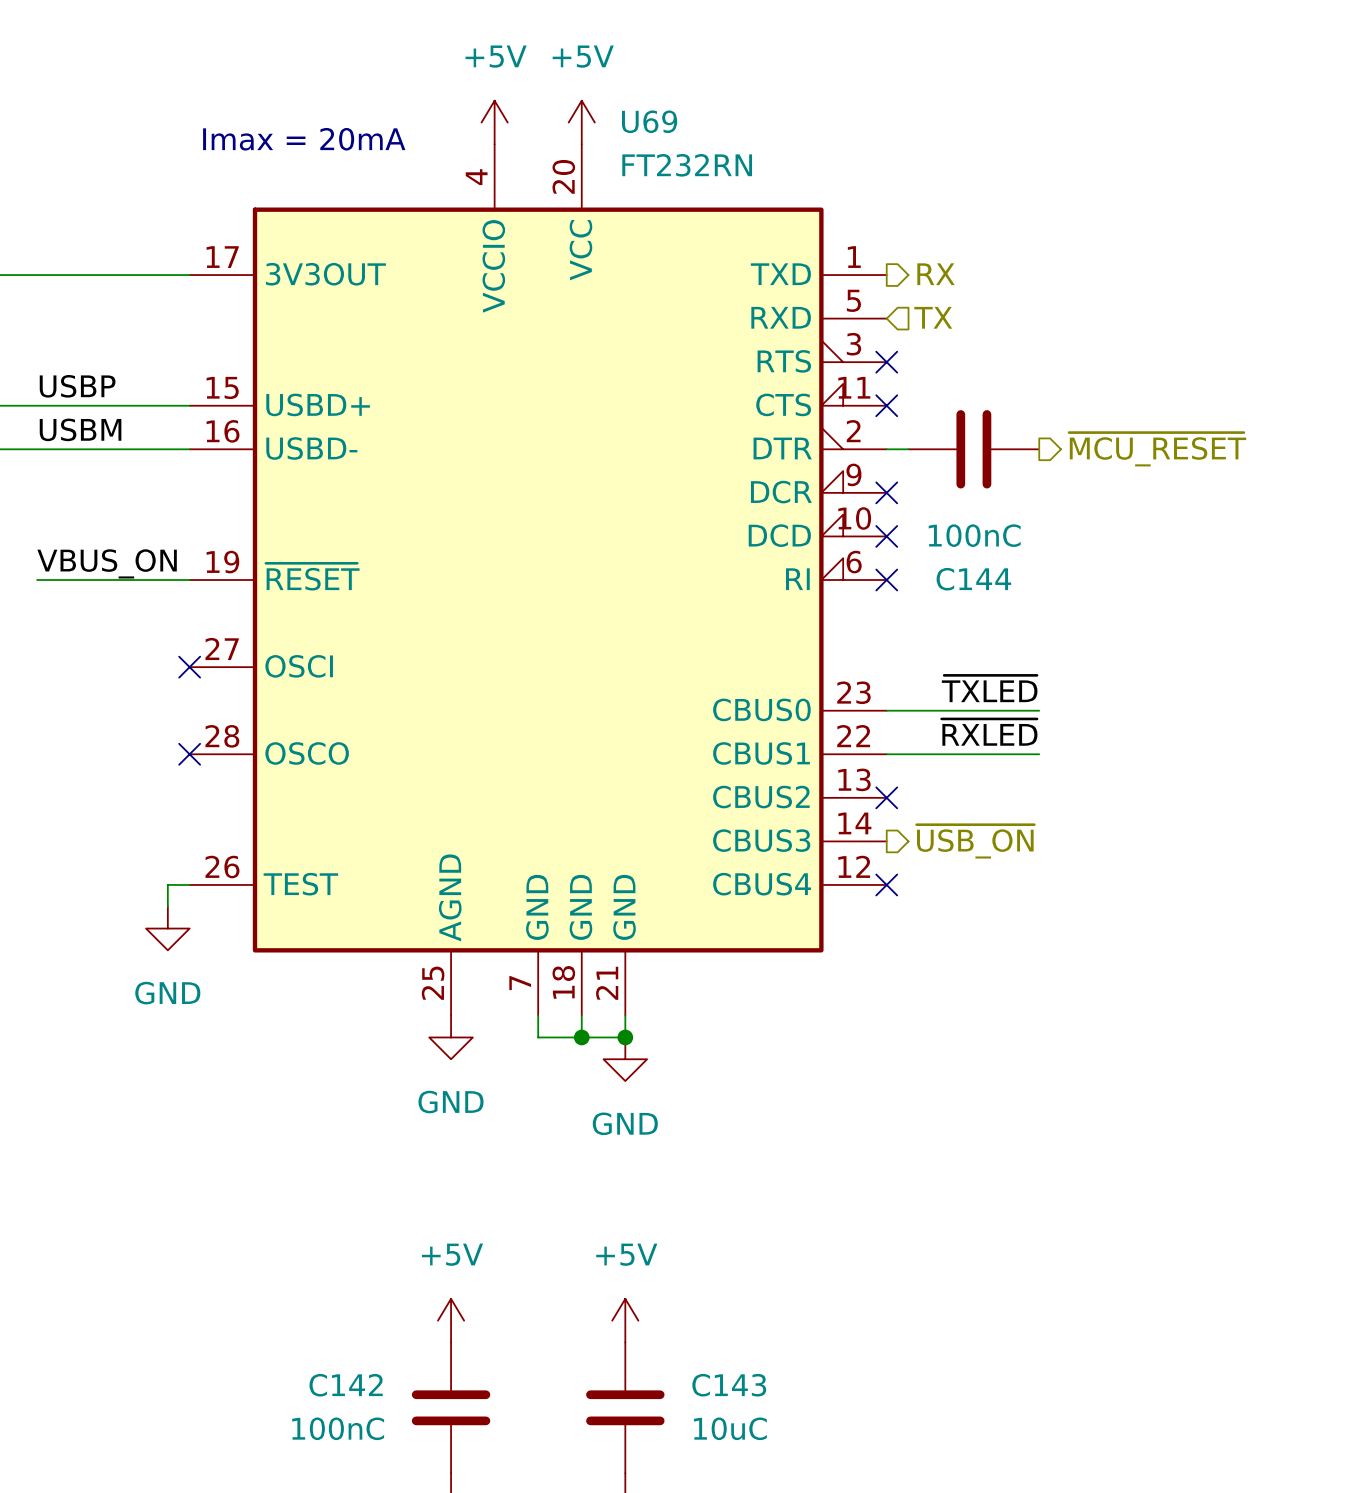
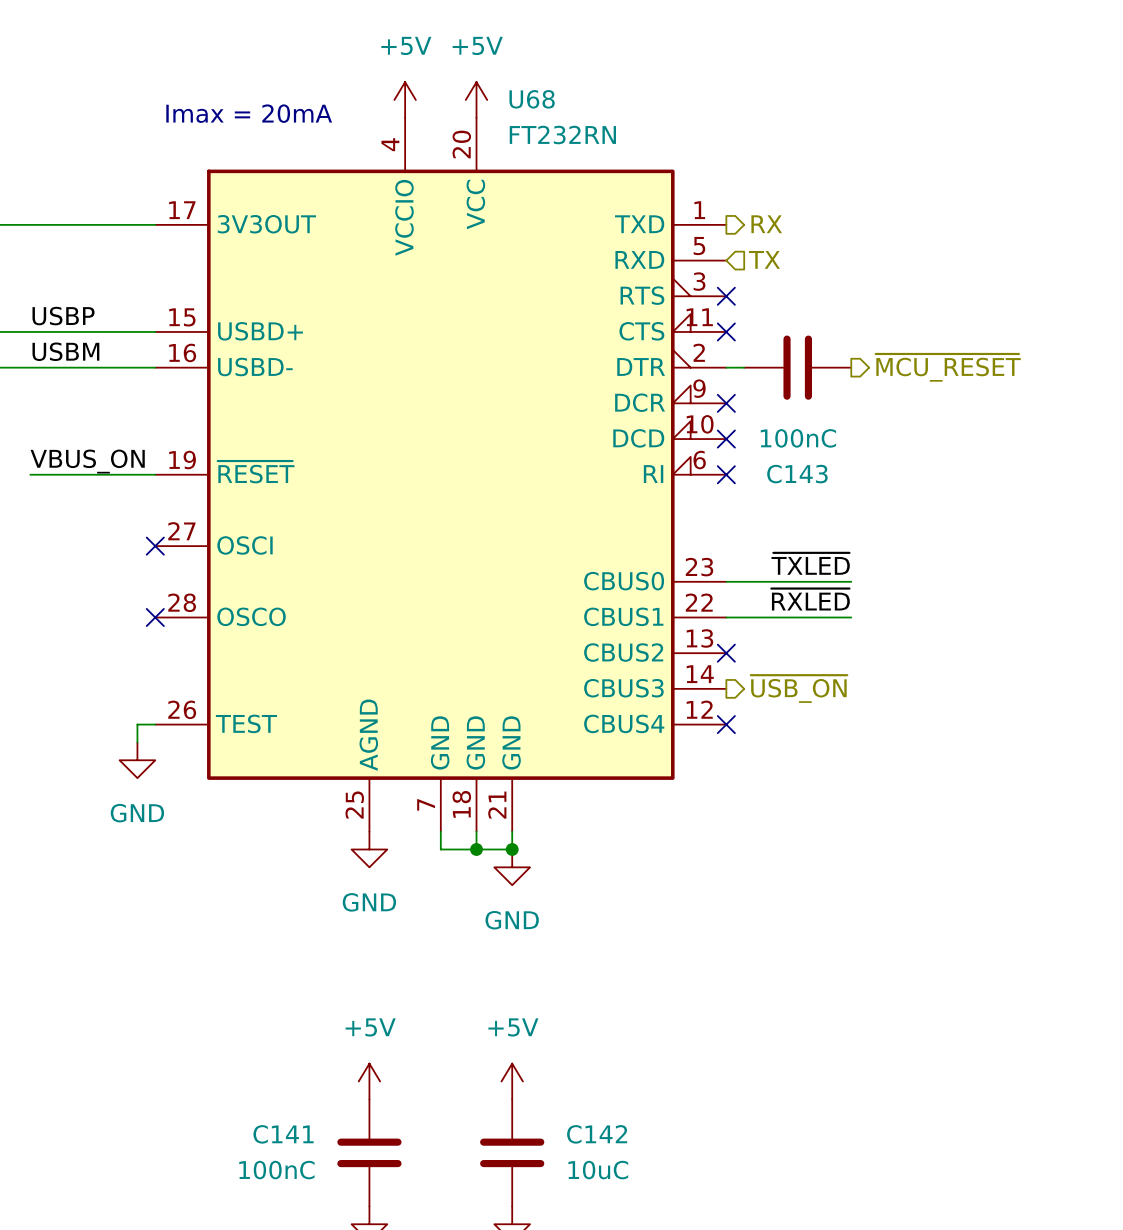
U69 name: U69 (649, 121) -> U68 (532, 99)
C144 name: C144 (973, 579) -> C143 (797, 474)
C142 name: C142 (346, 1385) -> C141 (283, 1134)
C143 name: C143 (729, 1385) -> C142 (597, 1134)

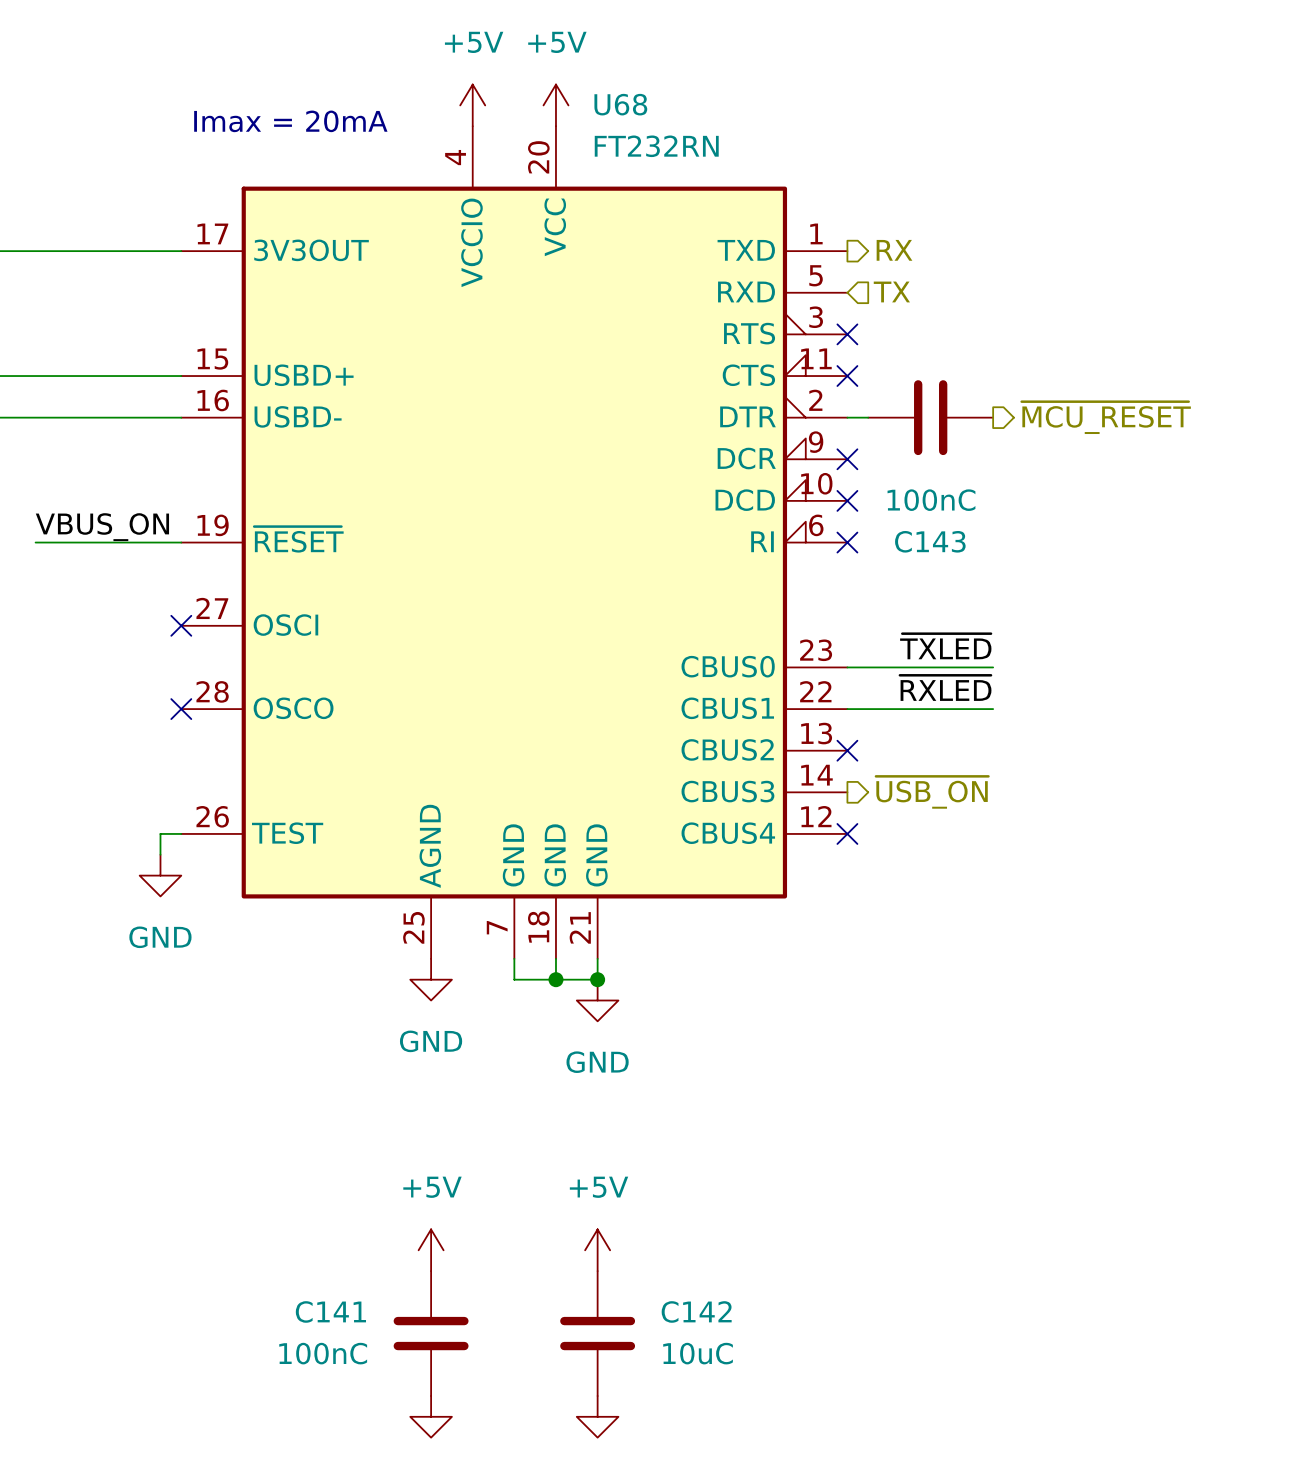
label: USBP (63, 316) -> none
label: USBM (65, 351) -> none

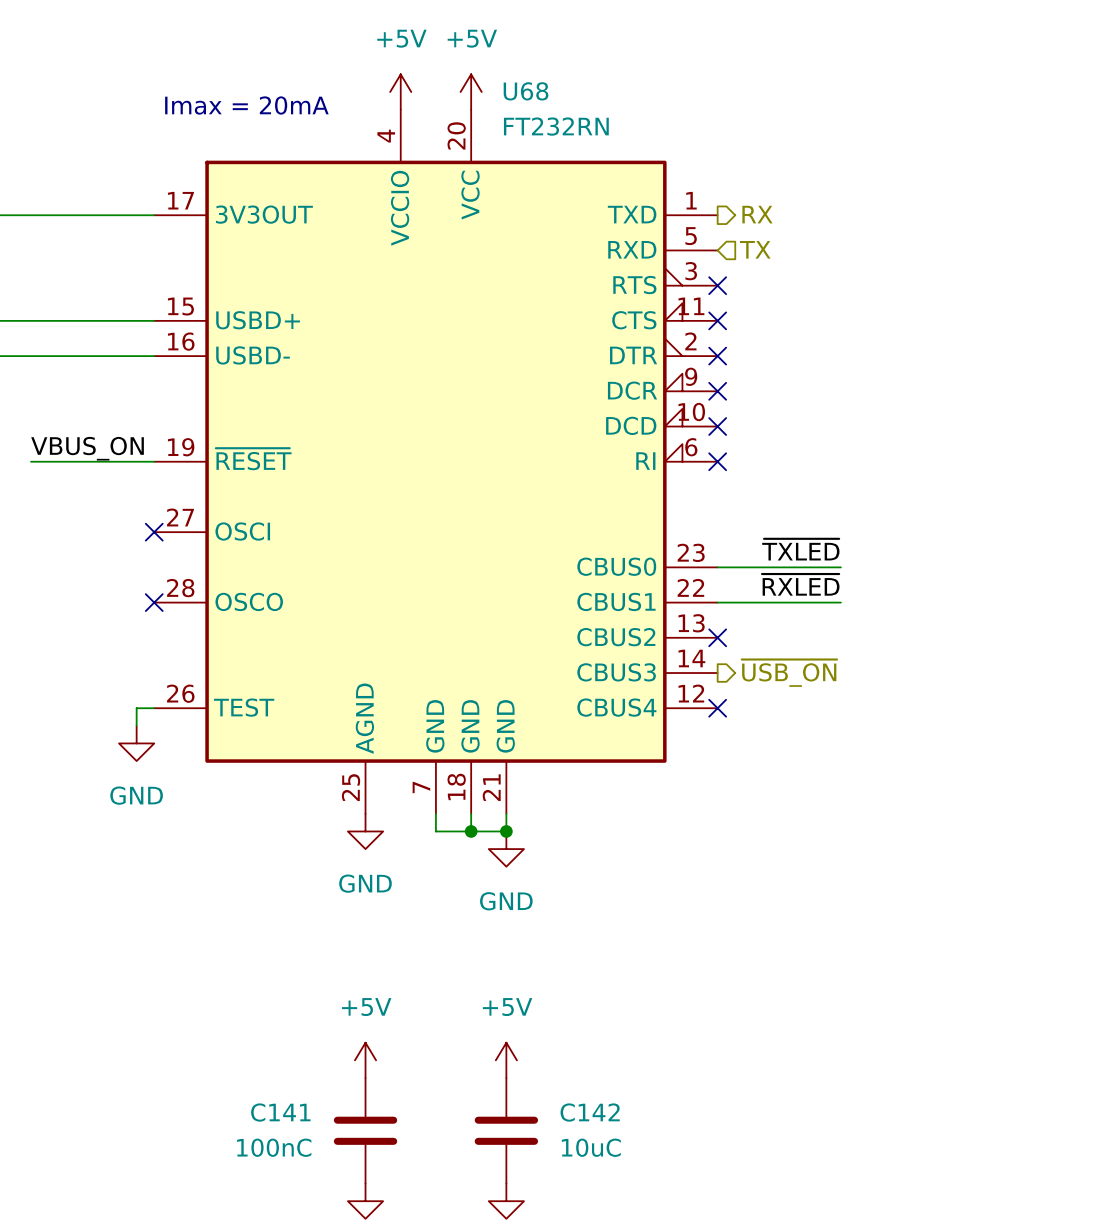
wire: (847, 417) (868, 417) -> none
no-connect mark: none -> (717, 356)
C143: 100nC (930, 417) -> none
hierarchical label: ~{MCU_RESET} (1106, 417) -> none

